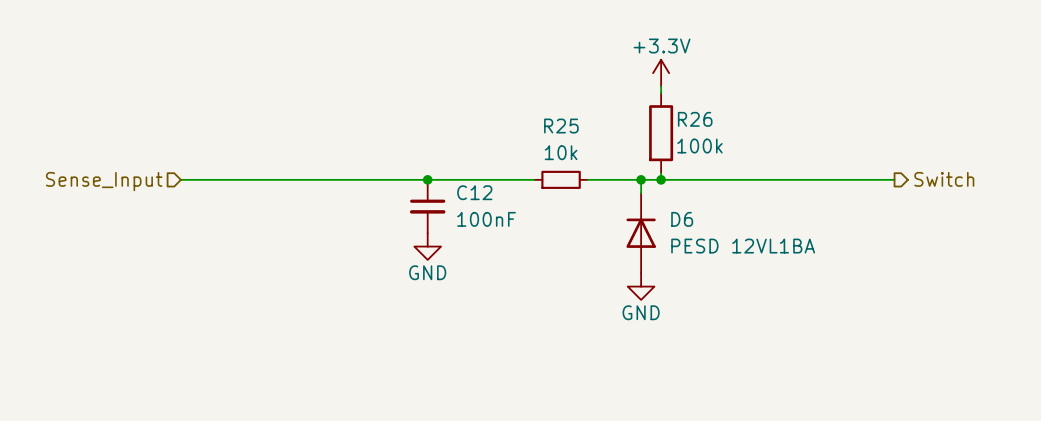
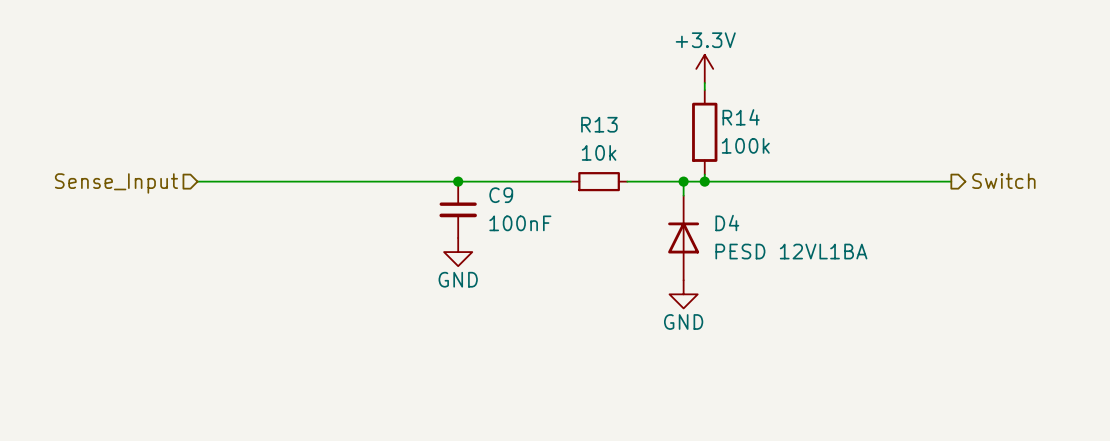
R26 name: R26 (695, 119) -> R14 (741, 117)
R25 name: R25 (561, 126) -> R13 (599, 124)
C12 name: C12 (474, 192) -> C9 (501, 195)
D6 name: D6 (682, 219) -> D4 (727, 223)

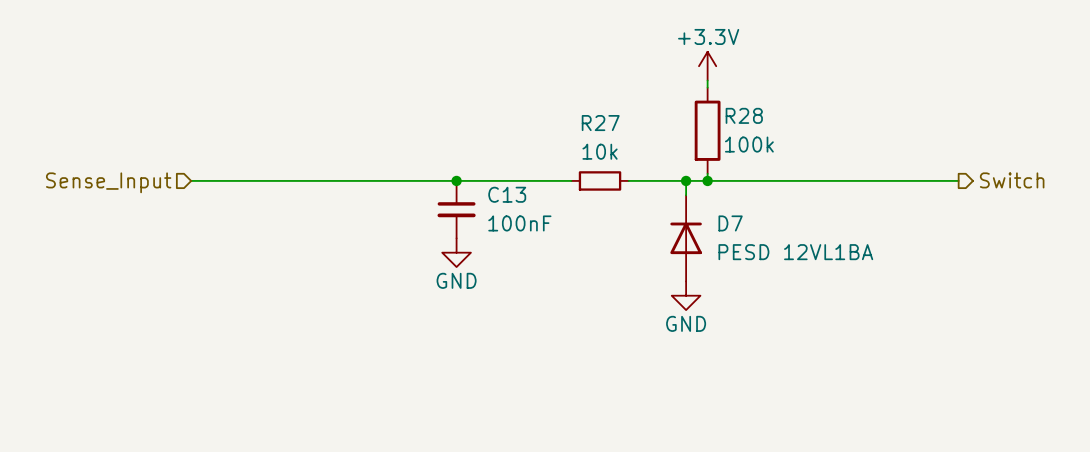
R14 name: R14 (741, 117) -> R28 (744, 115)
R13 name: R13 (599, 124) -> R27 (600, 123)
C9 name: C9 (501, 195) -> C13 (507, 194)
D4 name: D4 (727, 223) -> D7 (730, 223)

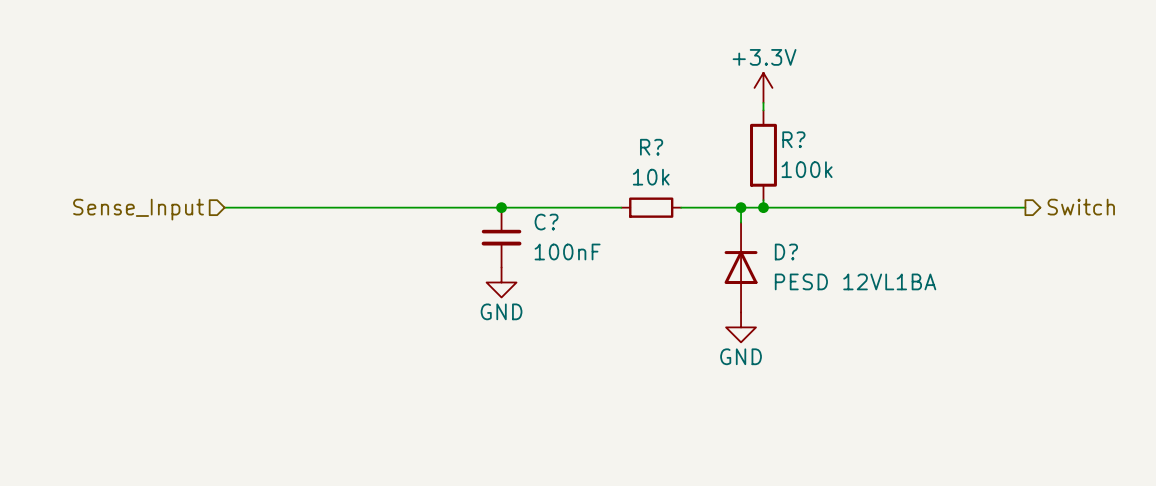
R28 name: R28 (744, 115) -> R? (793, 139)
R27 name: R27 (600, 123) -> R? (651, 147)
C13 name: C13 (507, 194) -> C? (546, 222)
D7 name: D7 (730, 223) -> D? (786, 251)

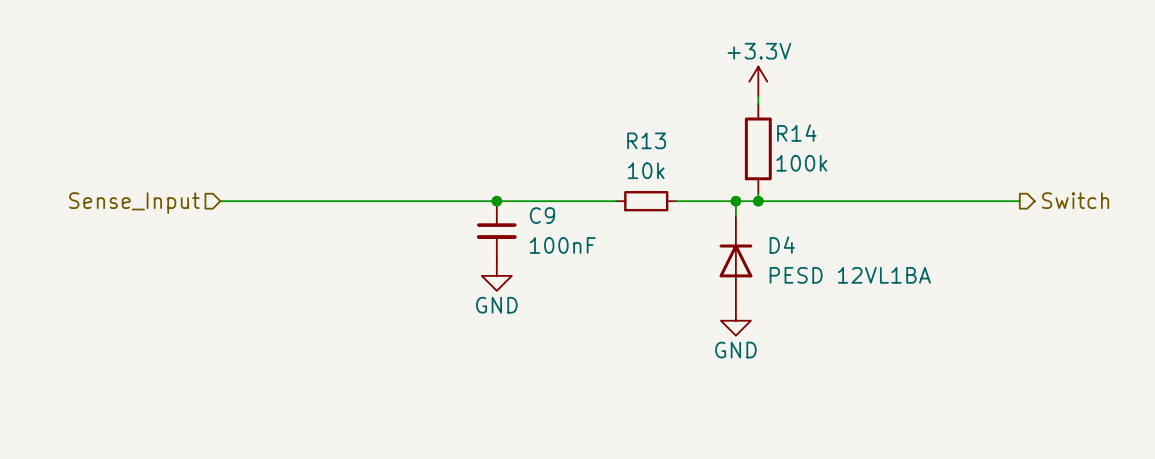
R? name: R? (793, 139) -> R14 (796, 133)
R? name: R? (651, 147) -> R13 (646, 140)
C? name: C? (546, 222) -> C9 (542, 215)
D? name: D? (786, 251) -> D4 (782, 245)

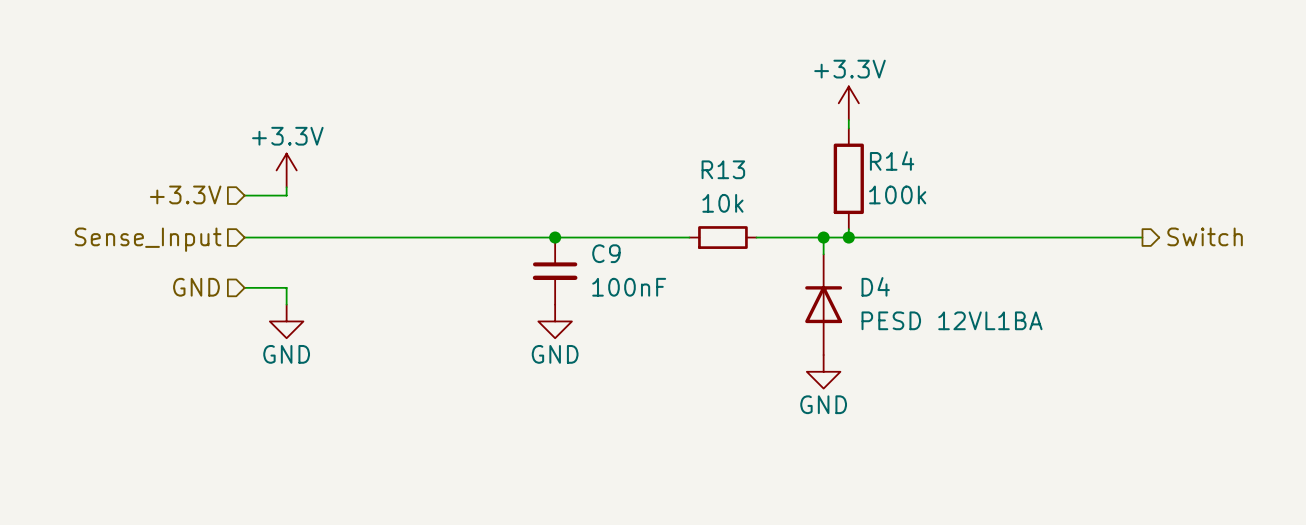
power symbol: none -> +3.3V (286, 170)
wire: none -> (286, 187) (286, 195) (244, 195)
hierarchical label: none -> +3.3V (185, 194)
hierarchical label: none -> GND (196, 287)
wire: none -> (244, 287) (286, 287) (286, 304)
power symbol: none -> GND (286, 321)

